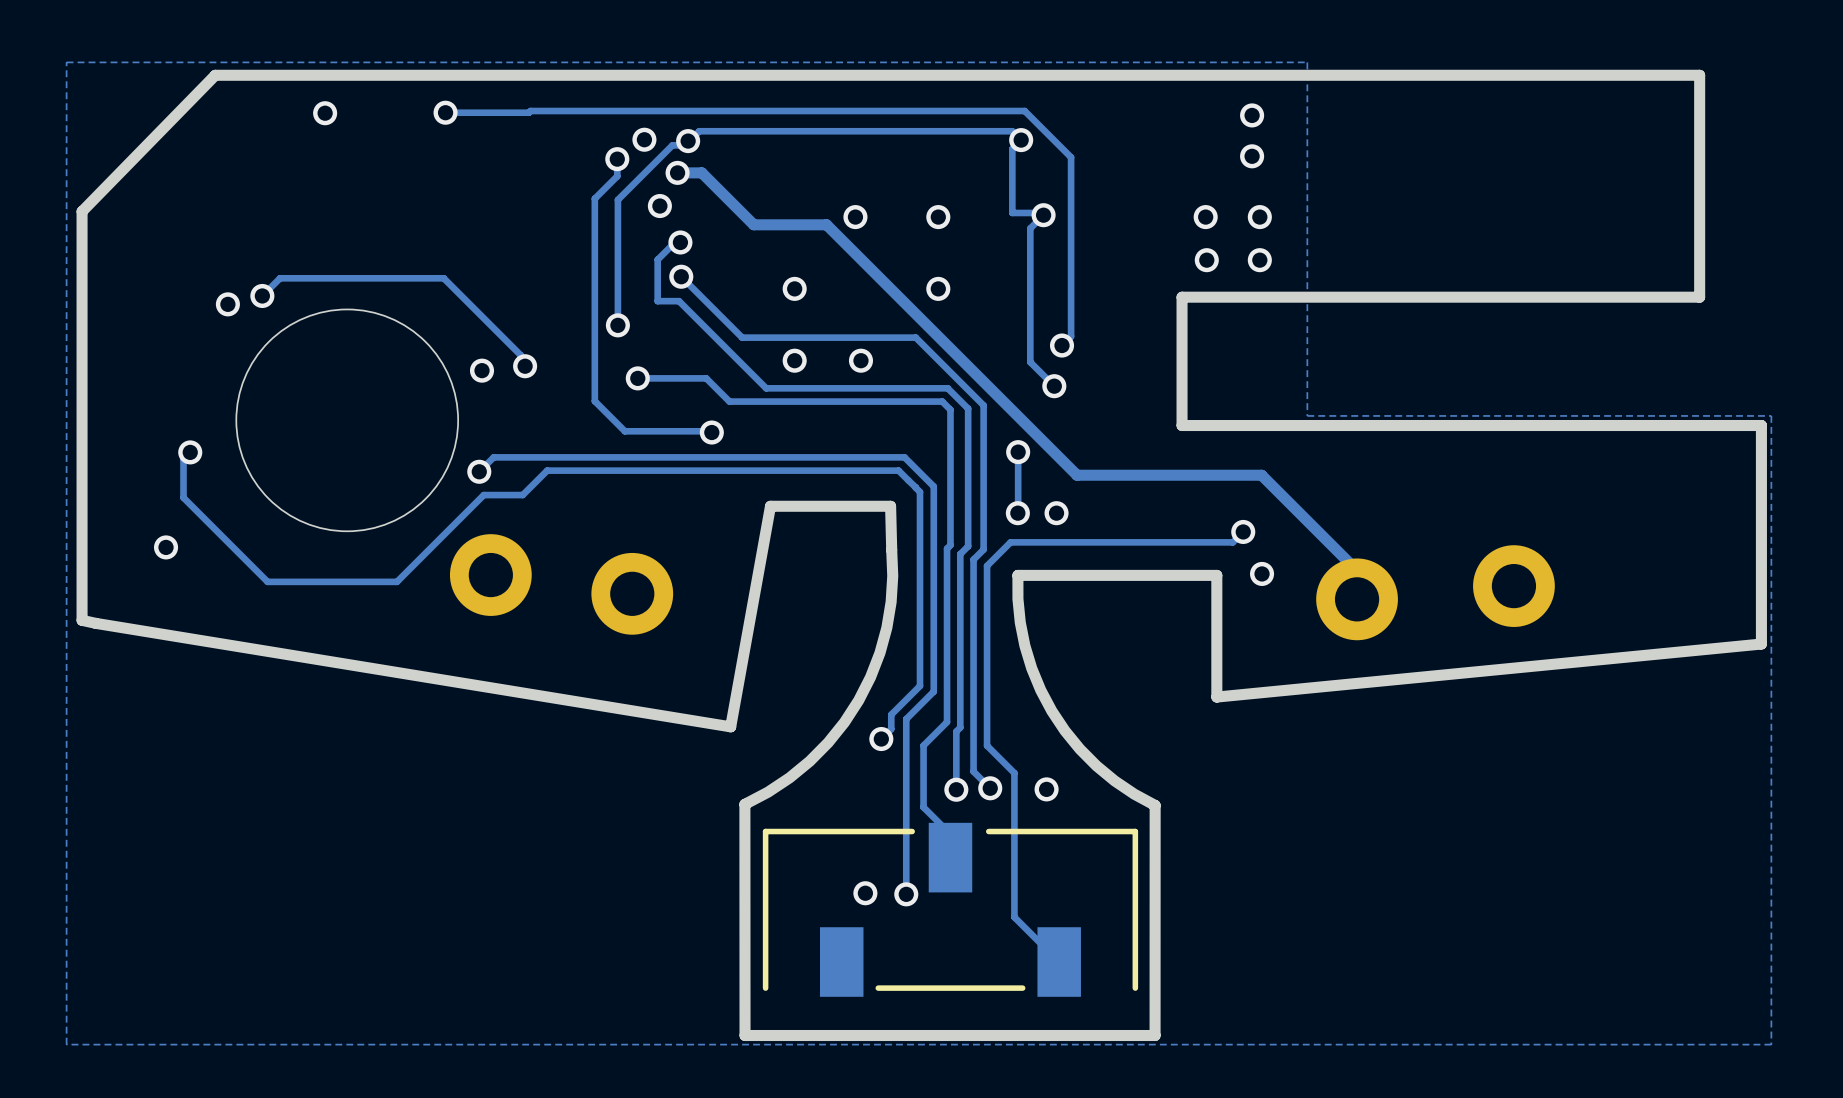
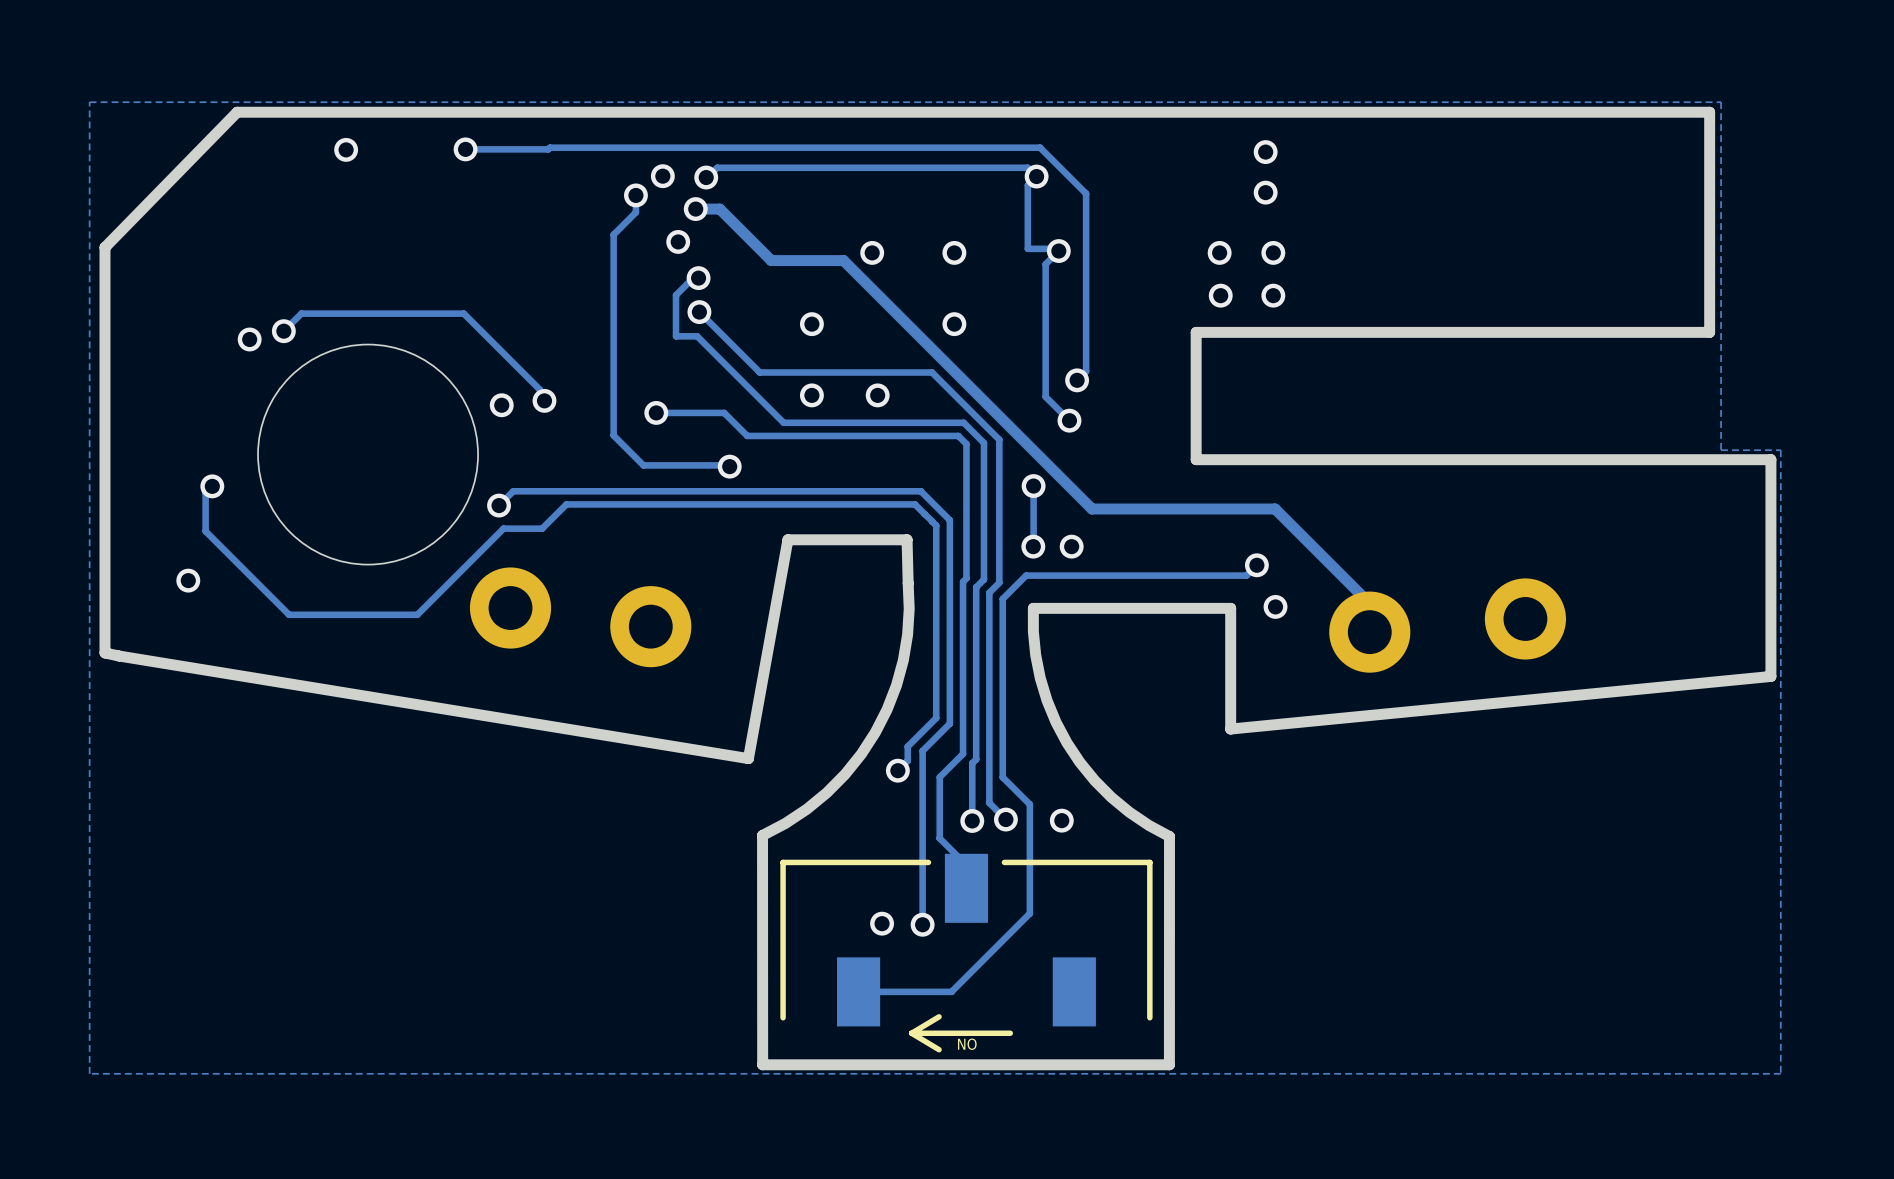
zone outline: (66, 65) (66, 62) (1307, 62) (1307, 415) (1711, 415) -> (89, 102) (1721, 102) (1721, 450)
track: (688, 141) (683, 145) (672, 145) (617, 199) (617, 325) -> none
via: (617, 325) -> none
part footprint: [762, 822, 1139, 997] -> [780, 853, 1153, 1053]
track: (1014, 882) (1014, 917) (1059, 962) -> (1029, 913) (951, 991) (858, 991)

